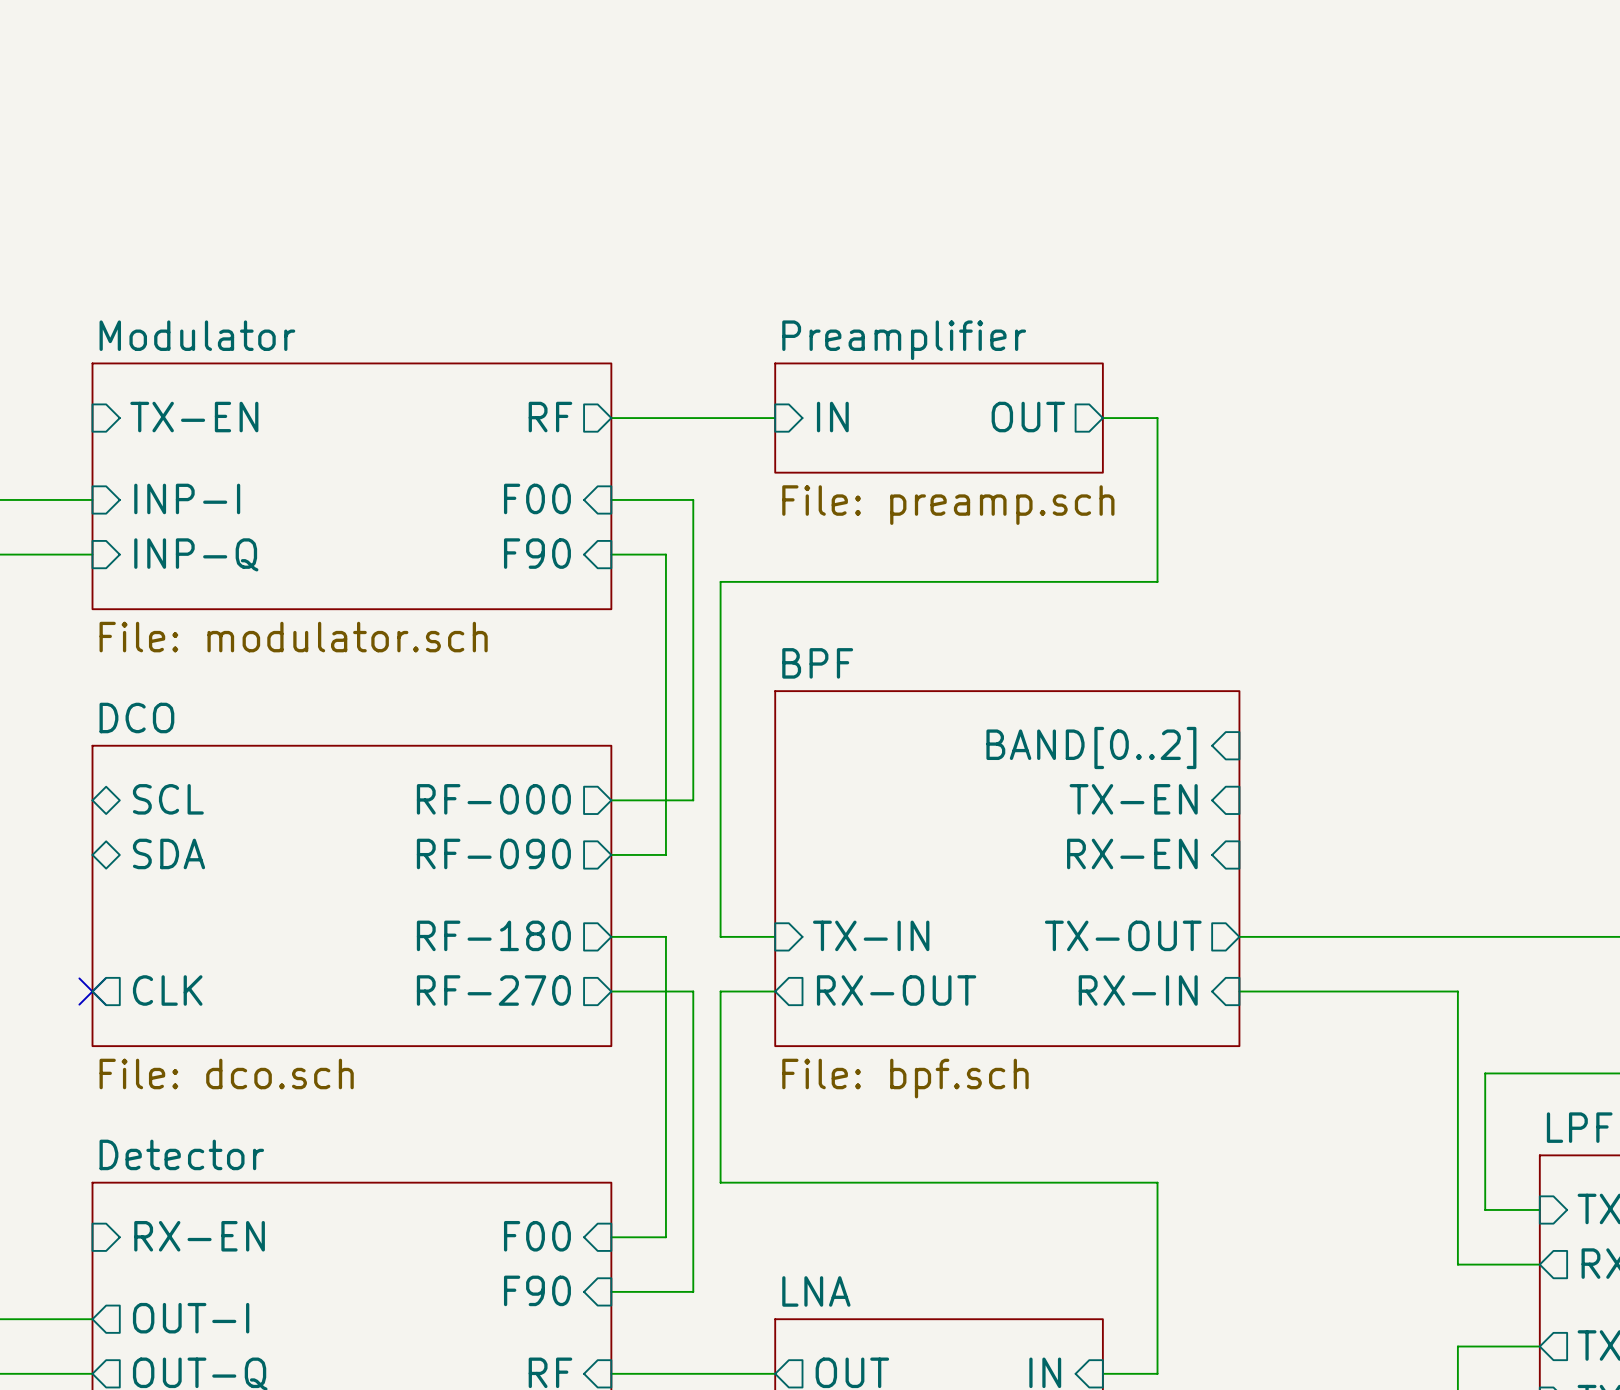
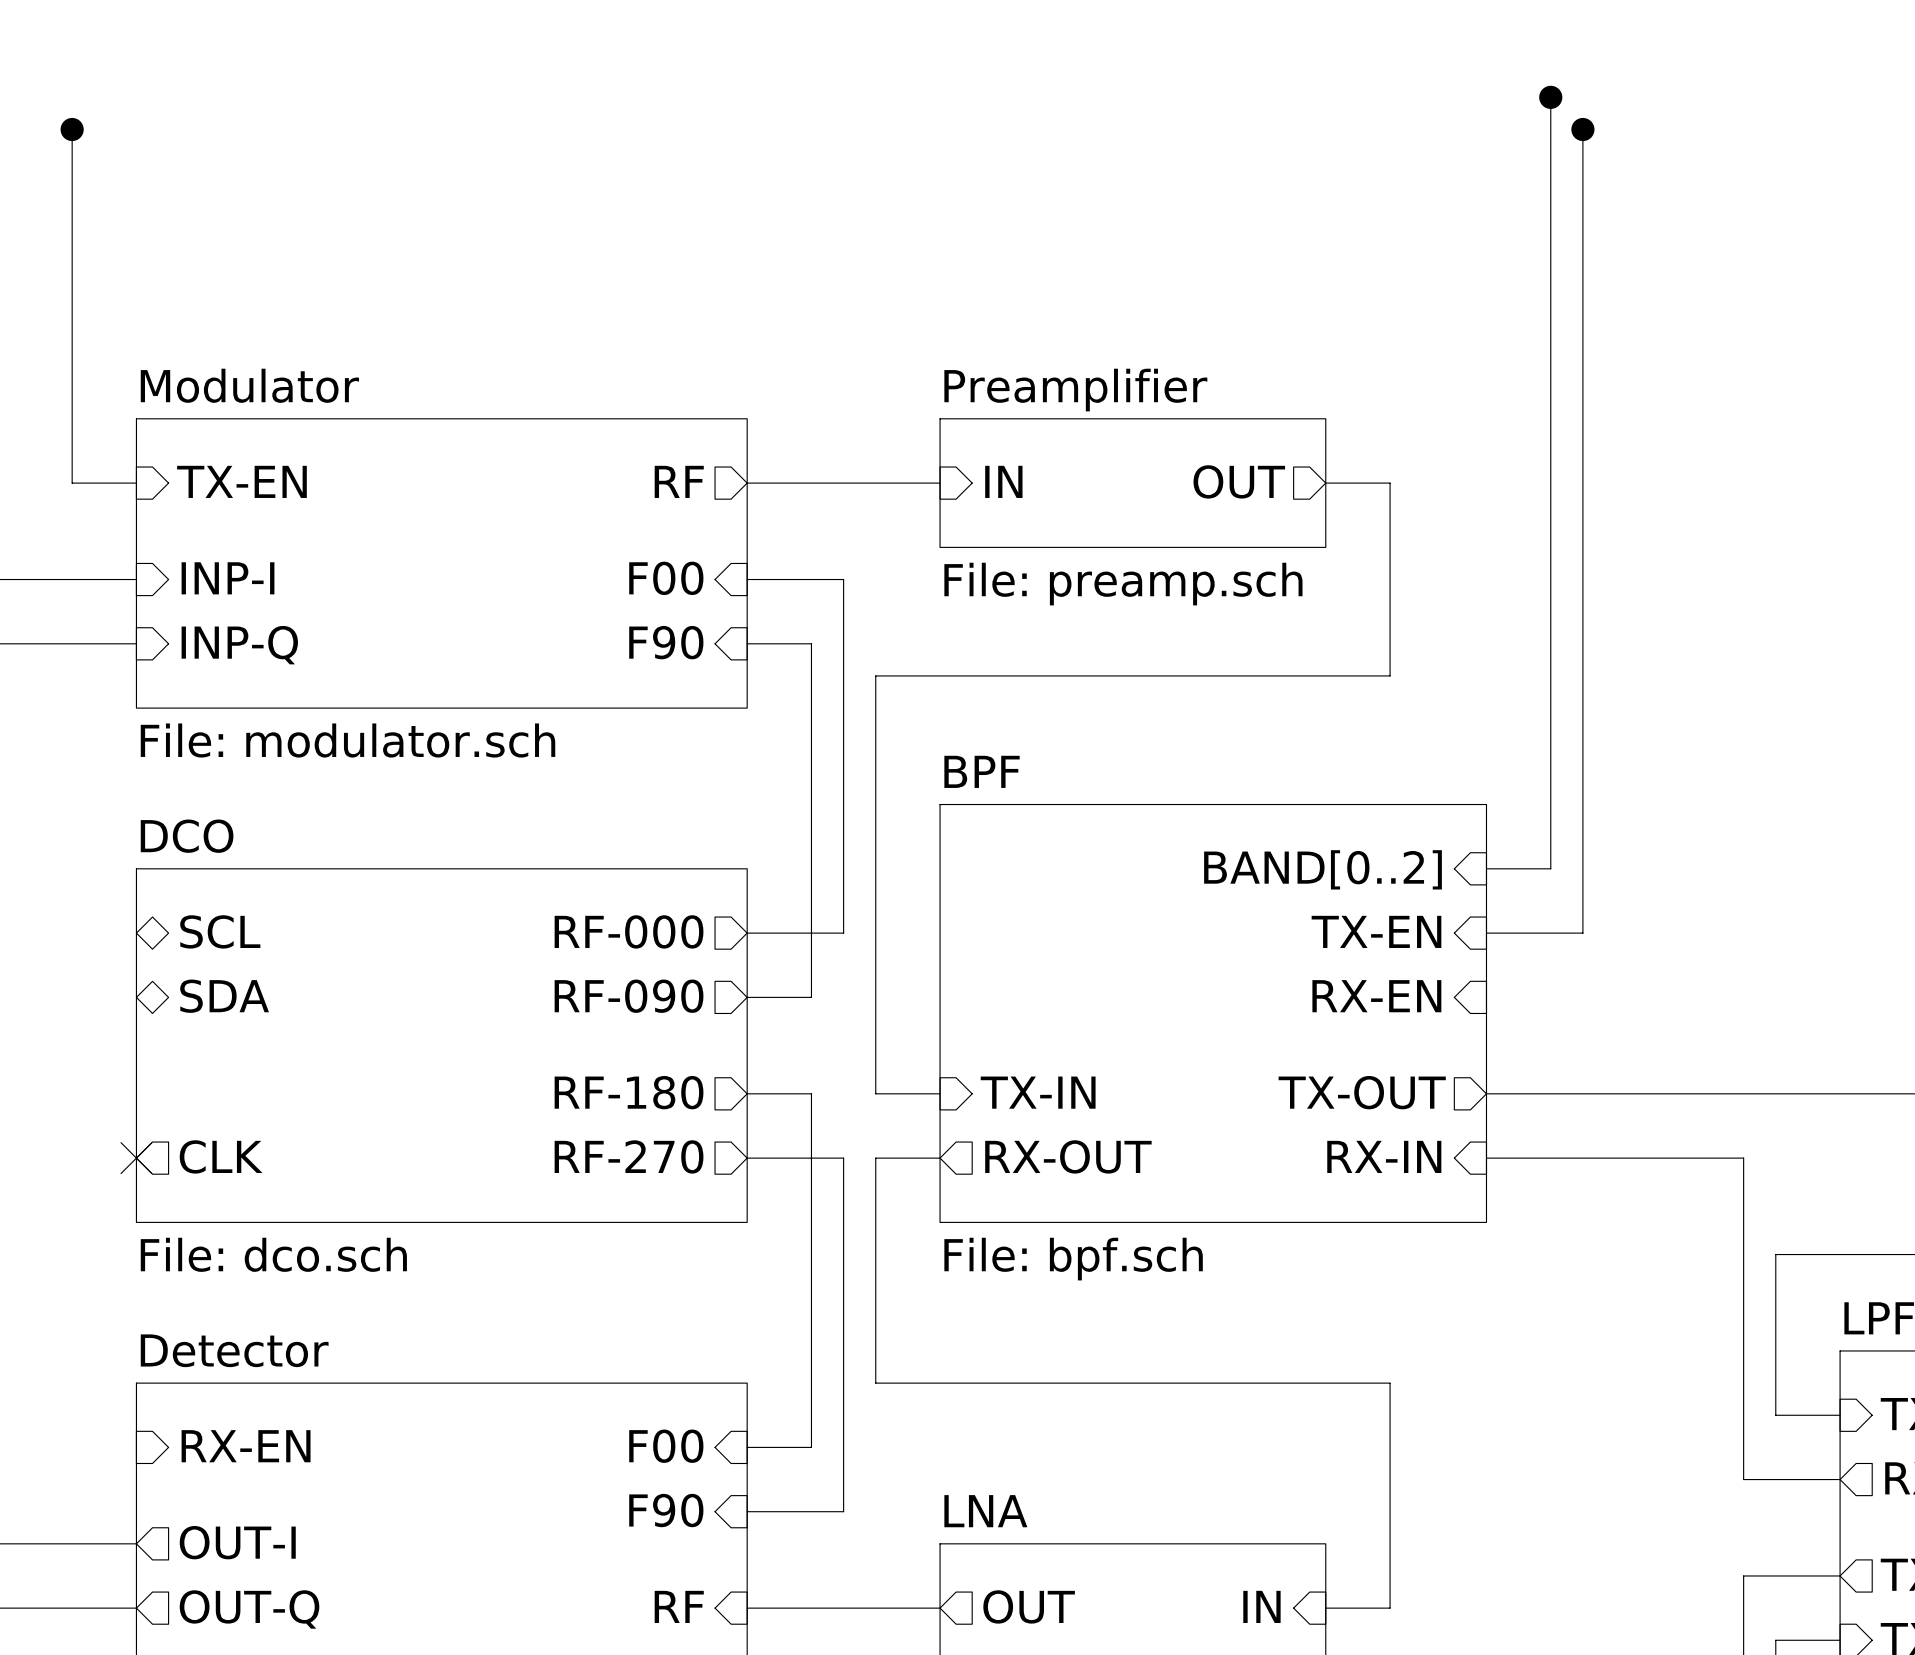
bus: none -> (1550, 97) (1550, 868) (1486, 868)
junction: none -> (1550, 97)
wire: none -> (72, 129) (72, 483) (136, 483)
junction: none -> (72, 129)
wire: none -> (1582, 129) (1582, 933) (1486, 933)
junction: none -> (1582, 129)

